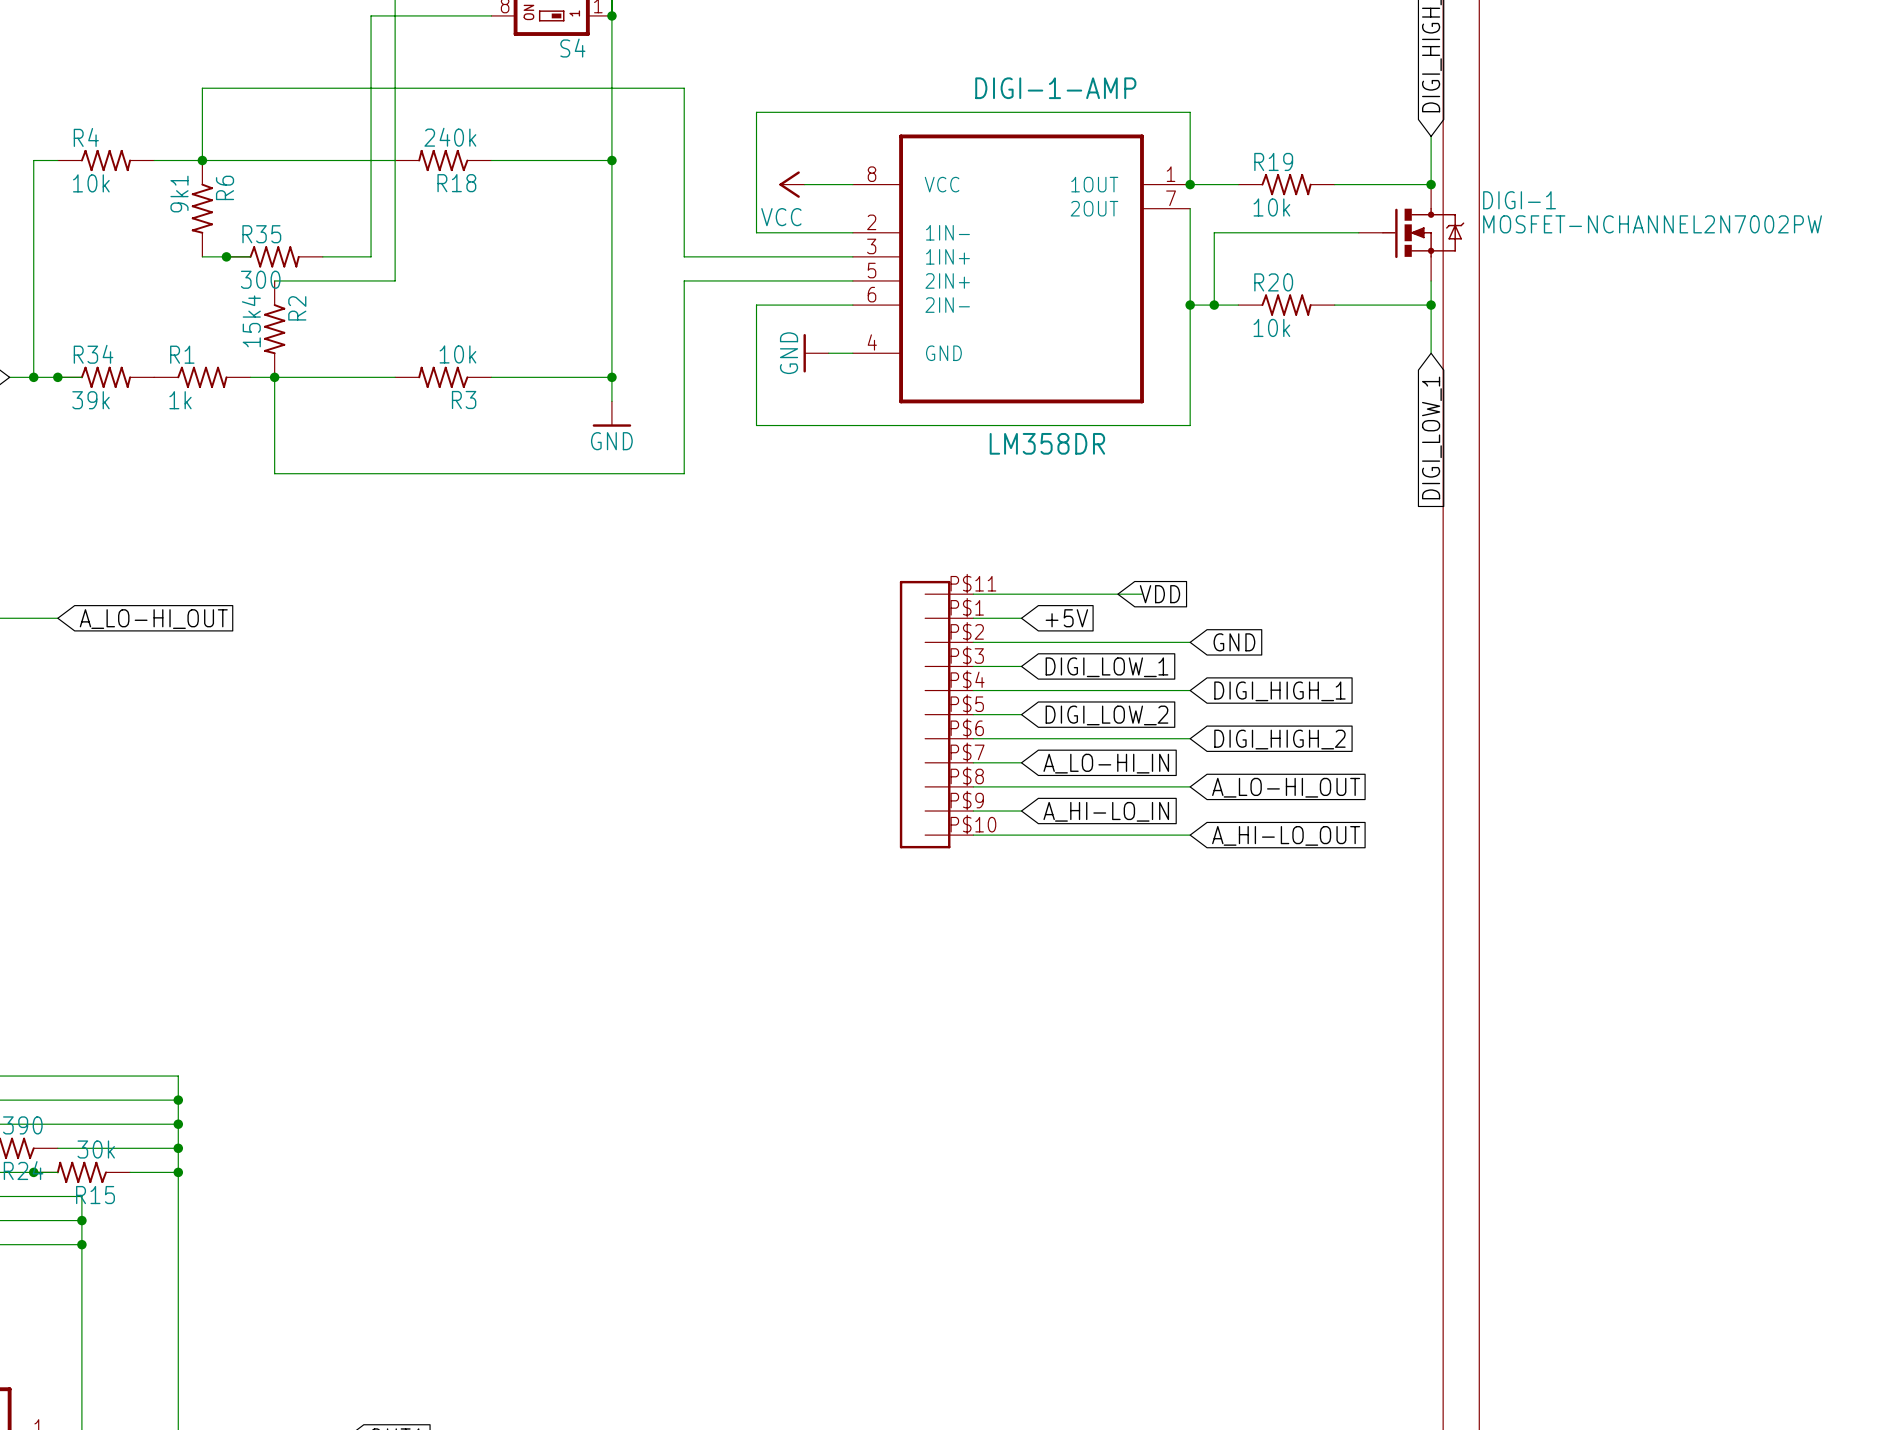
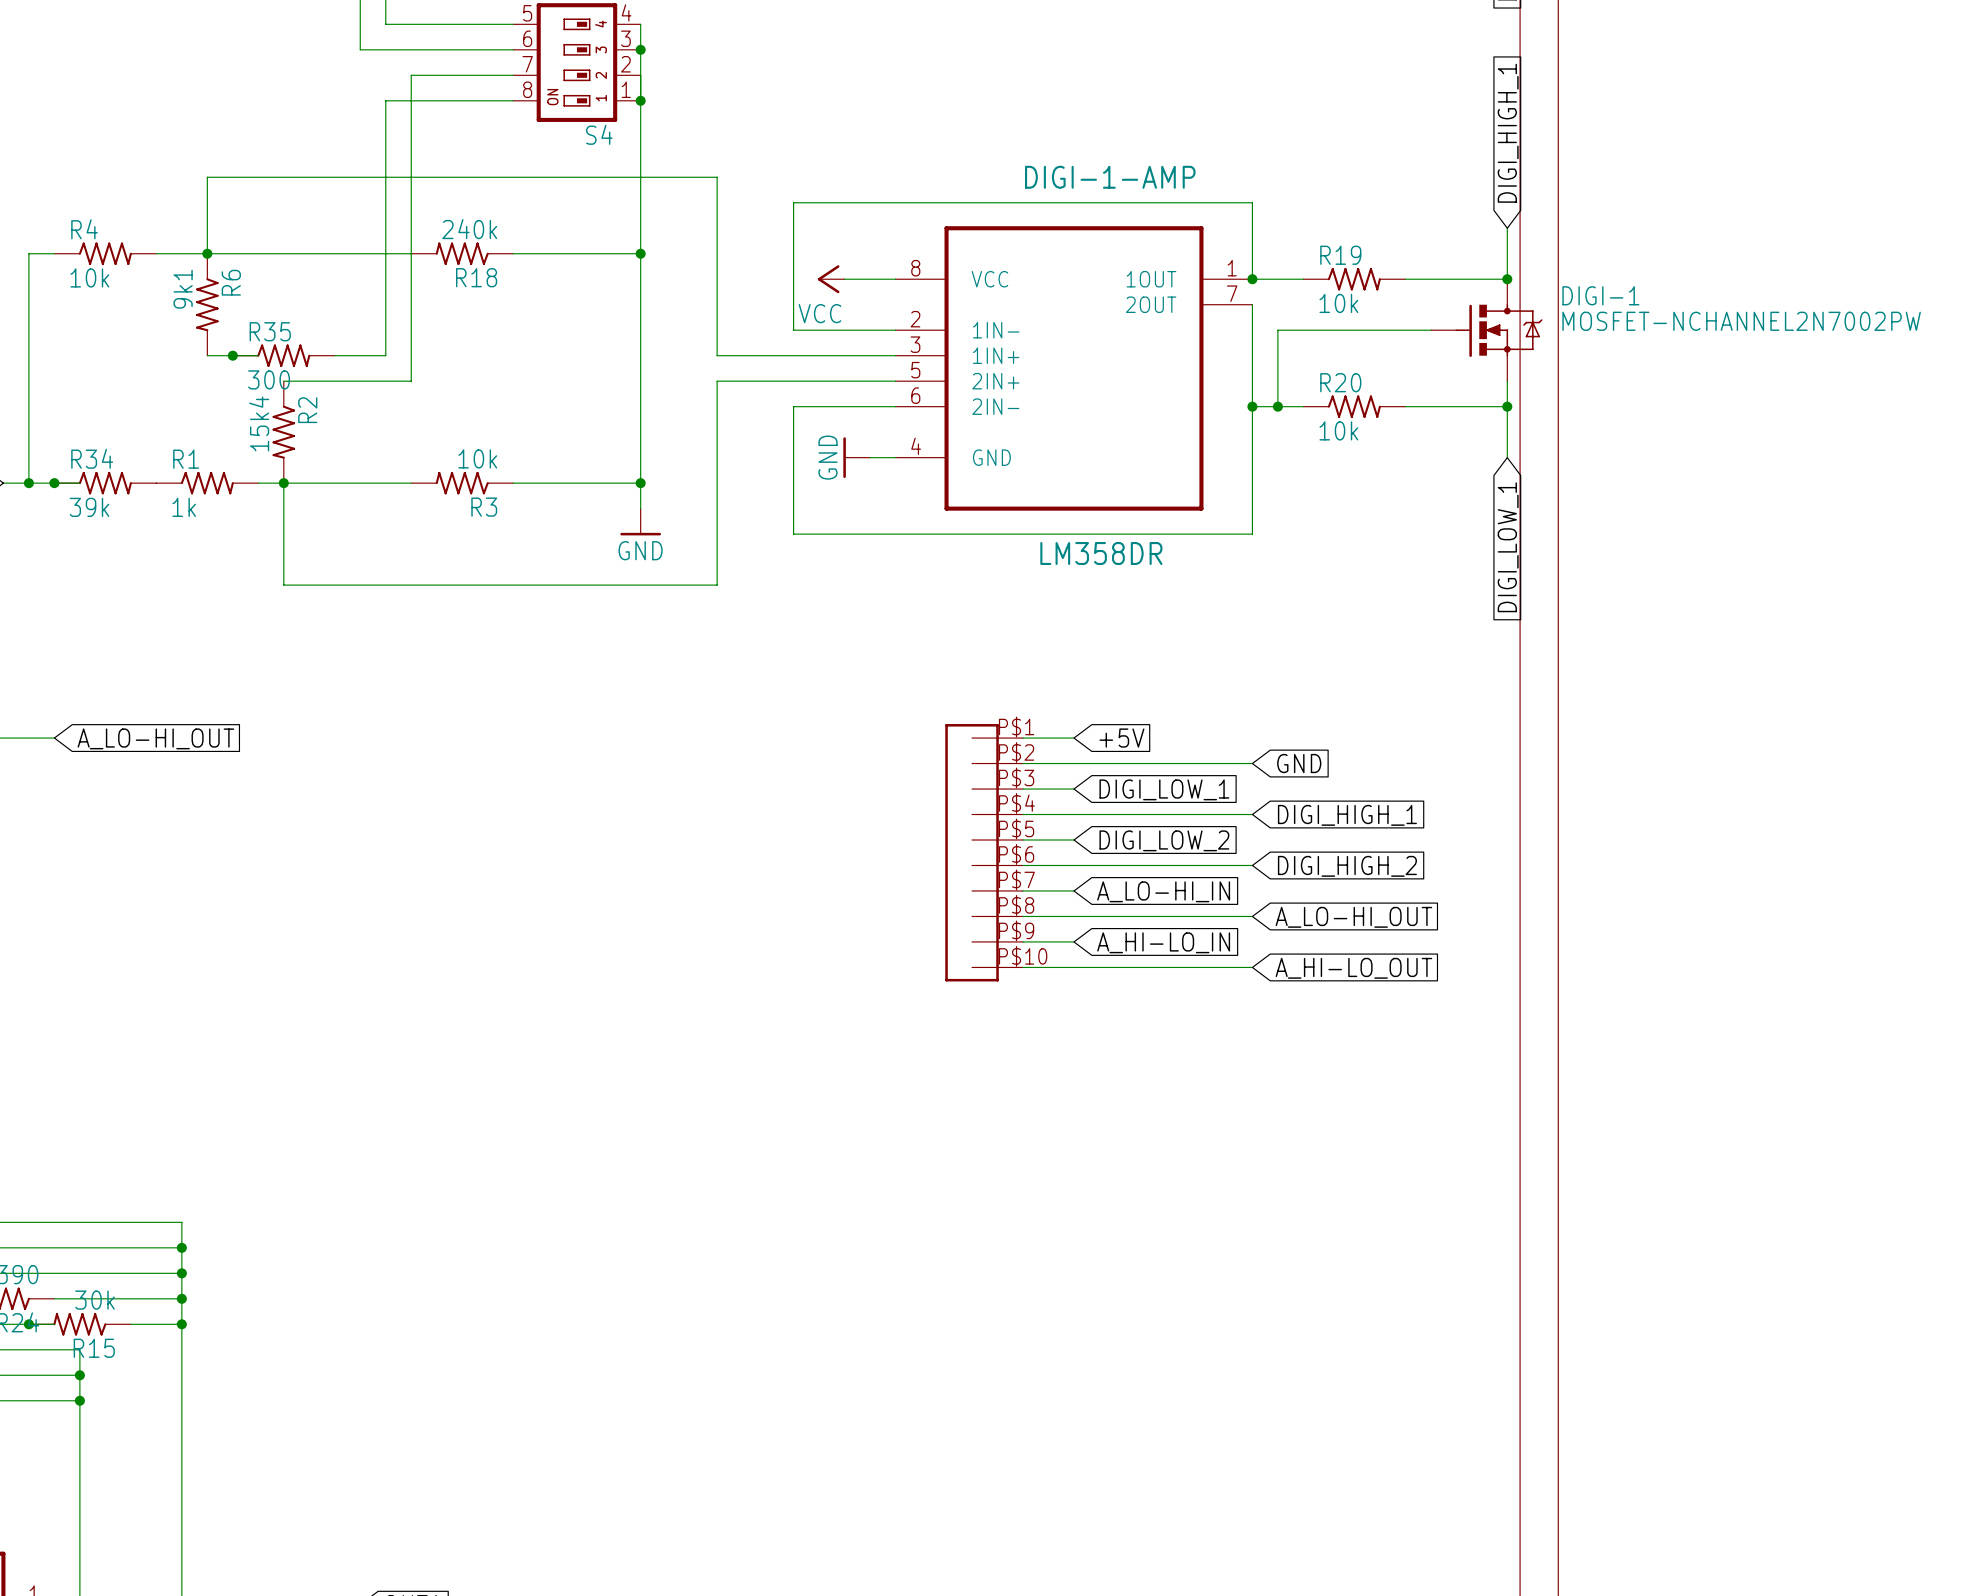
wire: (973, 594) (1141, 594) -> none
global label: VDD (1159, 594) -> none
part: (936, 714) -> none
part: none -> (984, 852)

